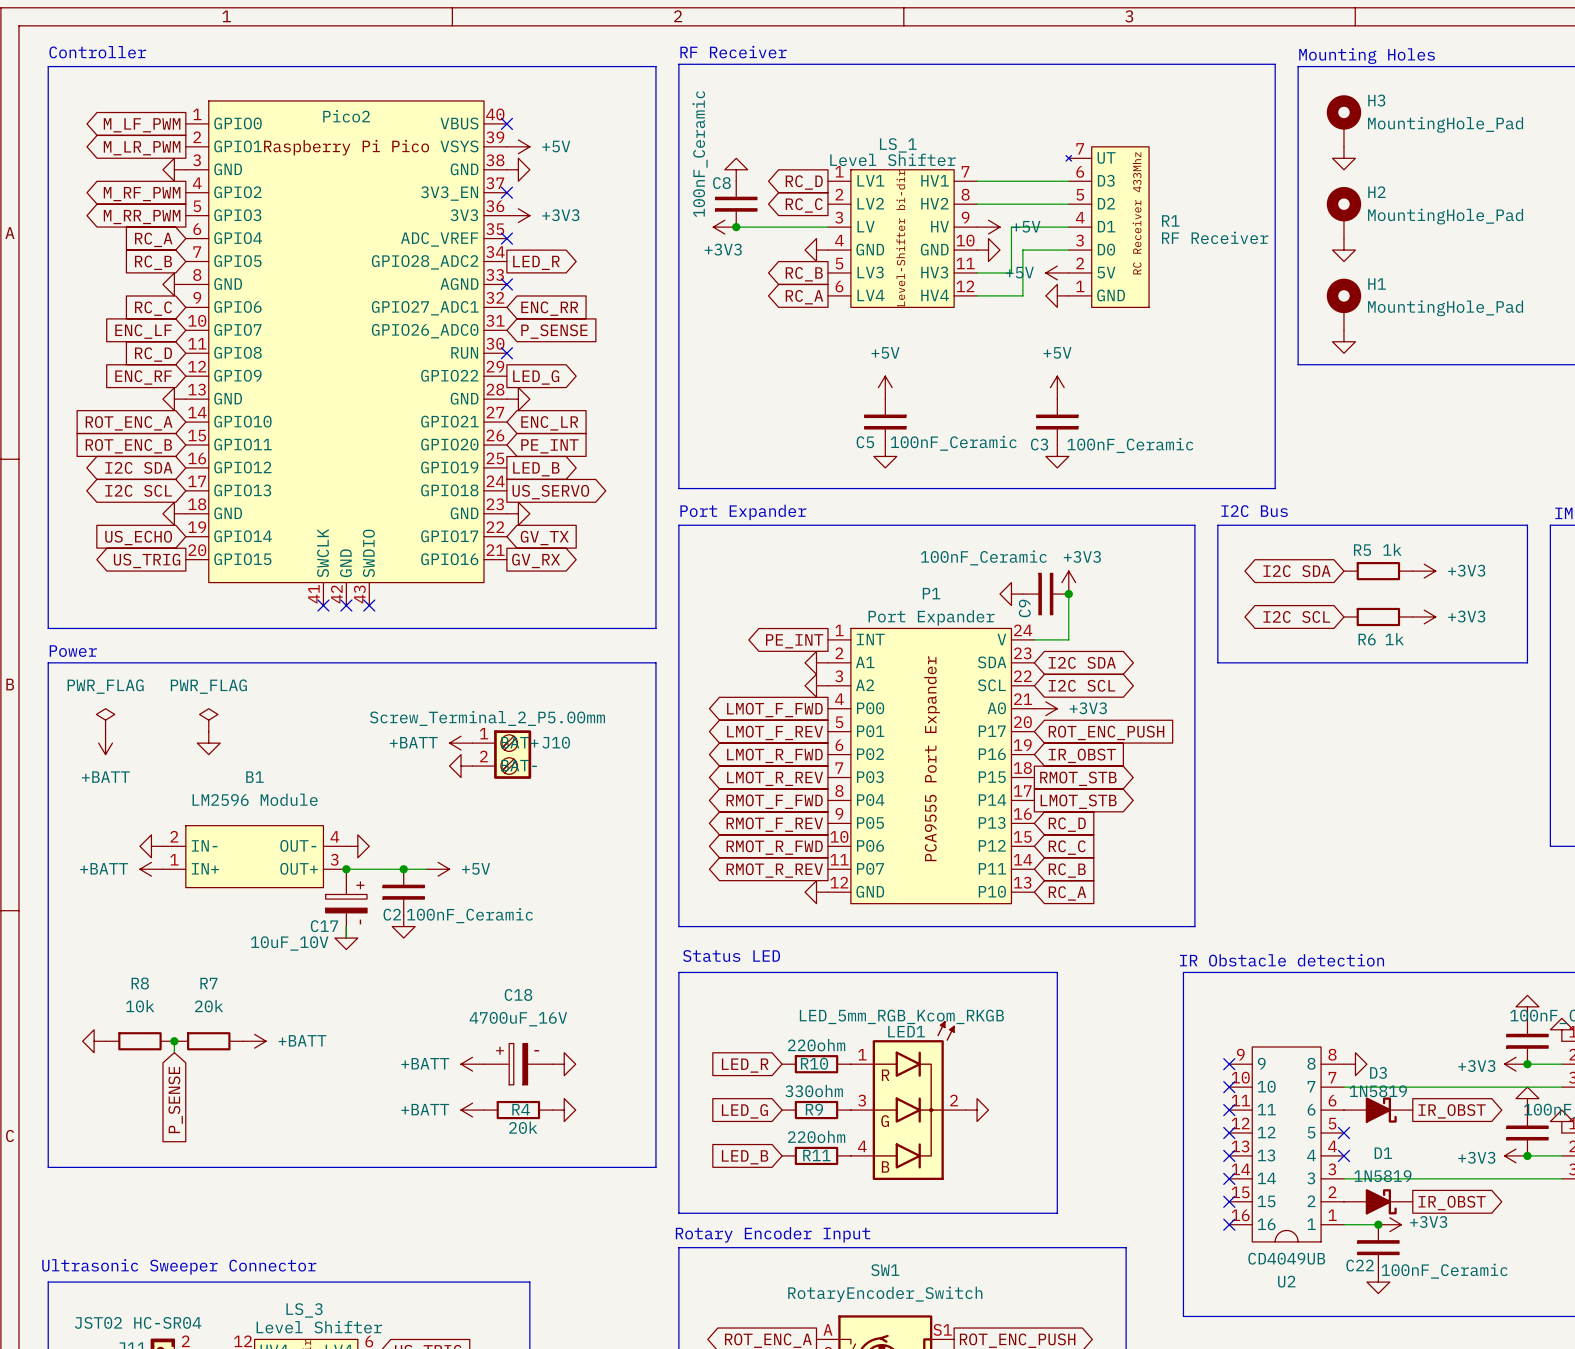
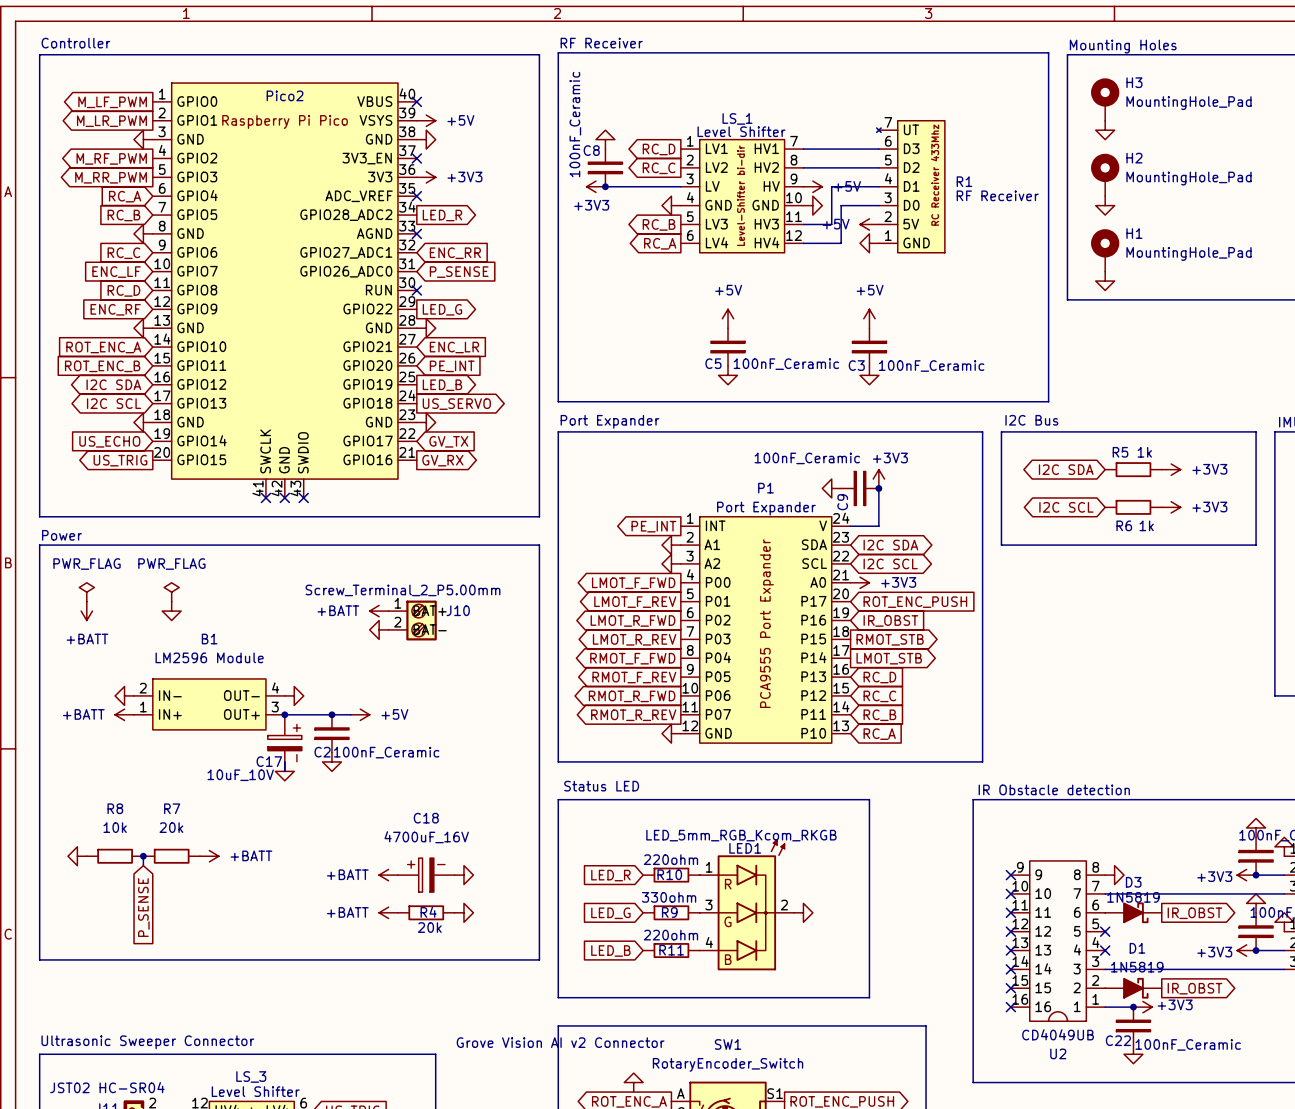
text: Rotary Encoder Input (773, 1234) -> none
text: none -> Grove Vision AI v2 Connector (560, 1042)
power symbol: none -> (633, 1082)

